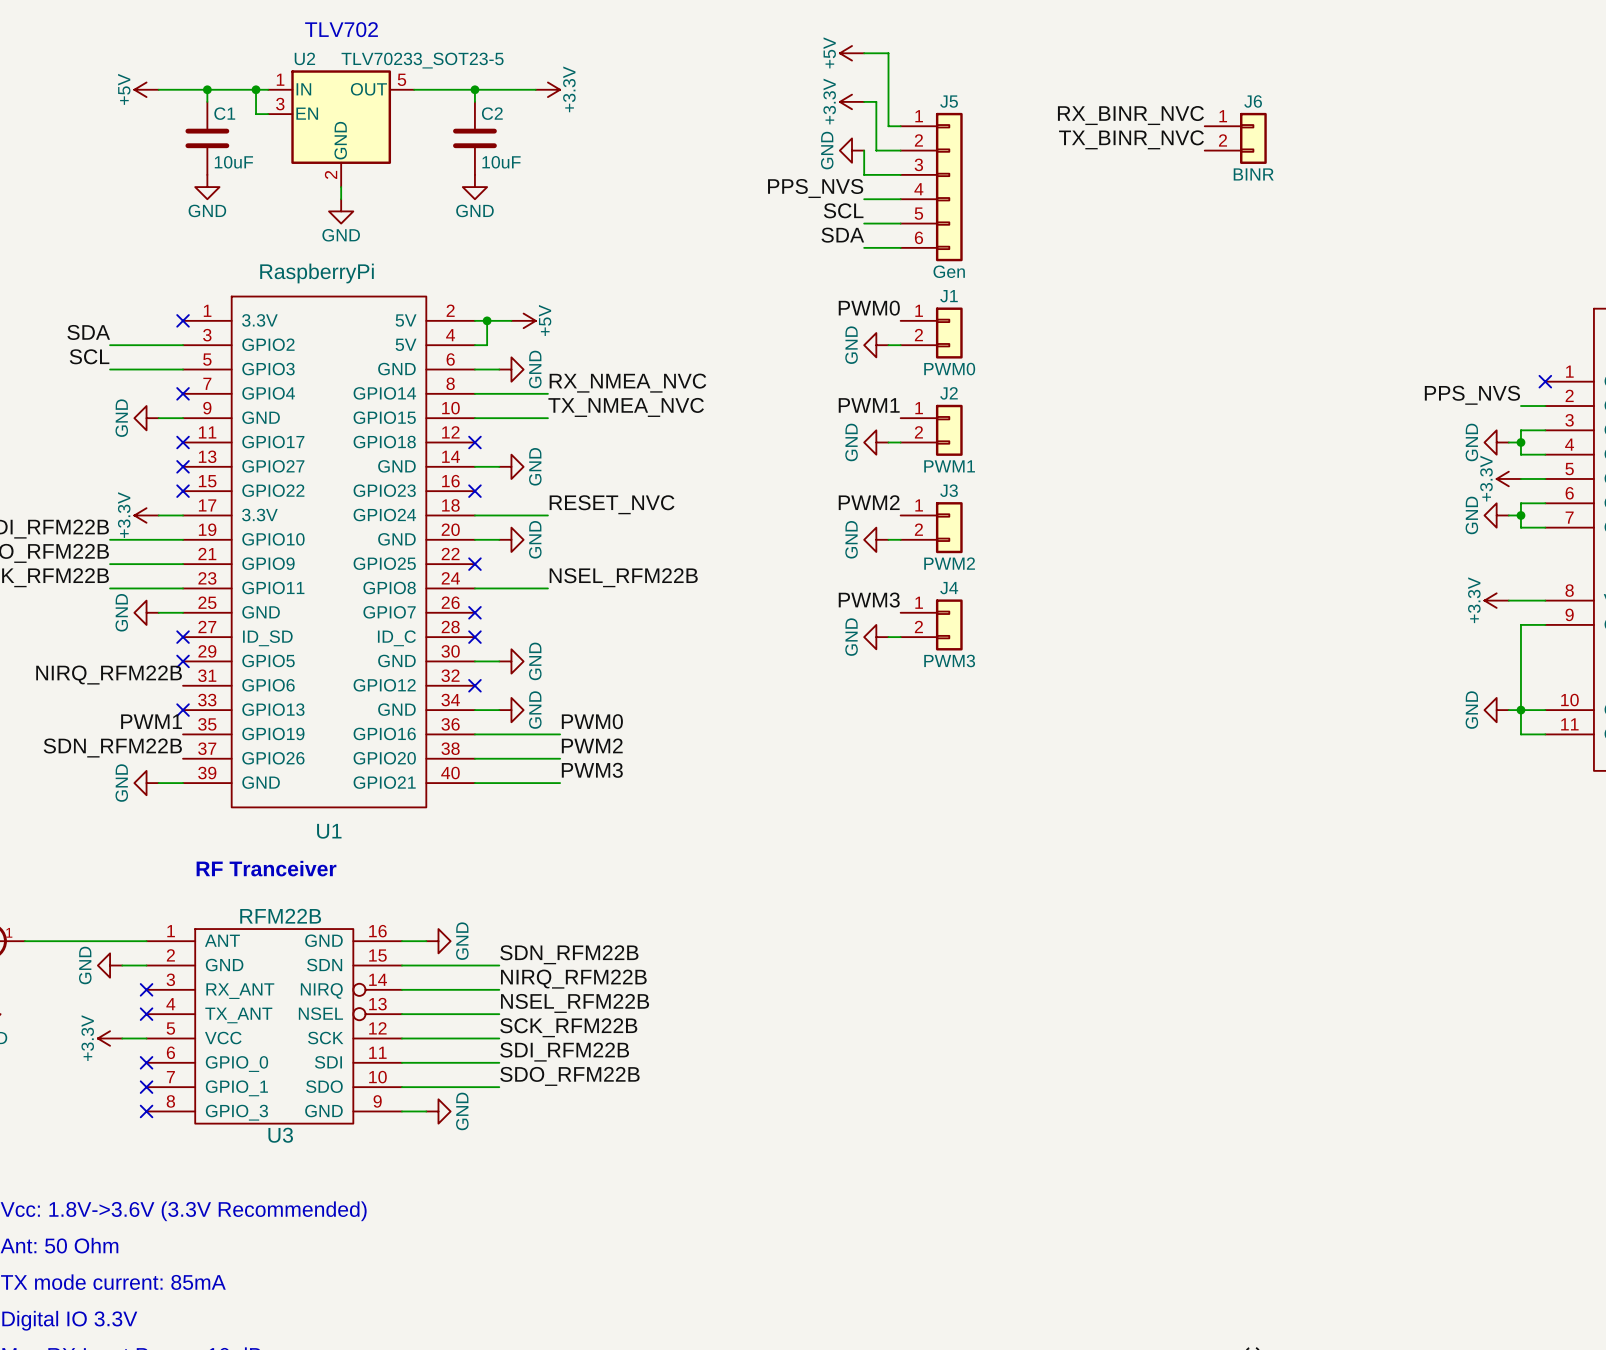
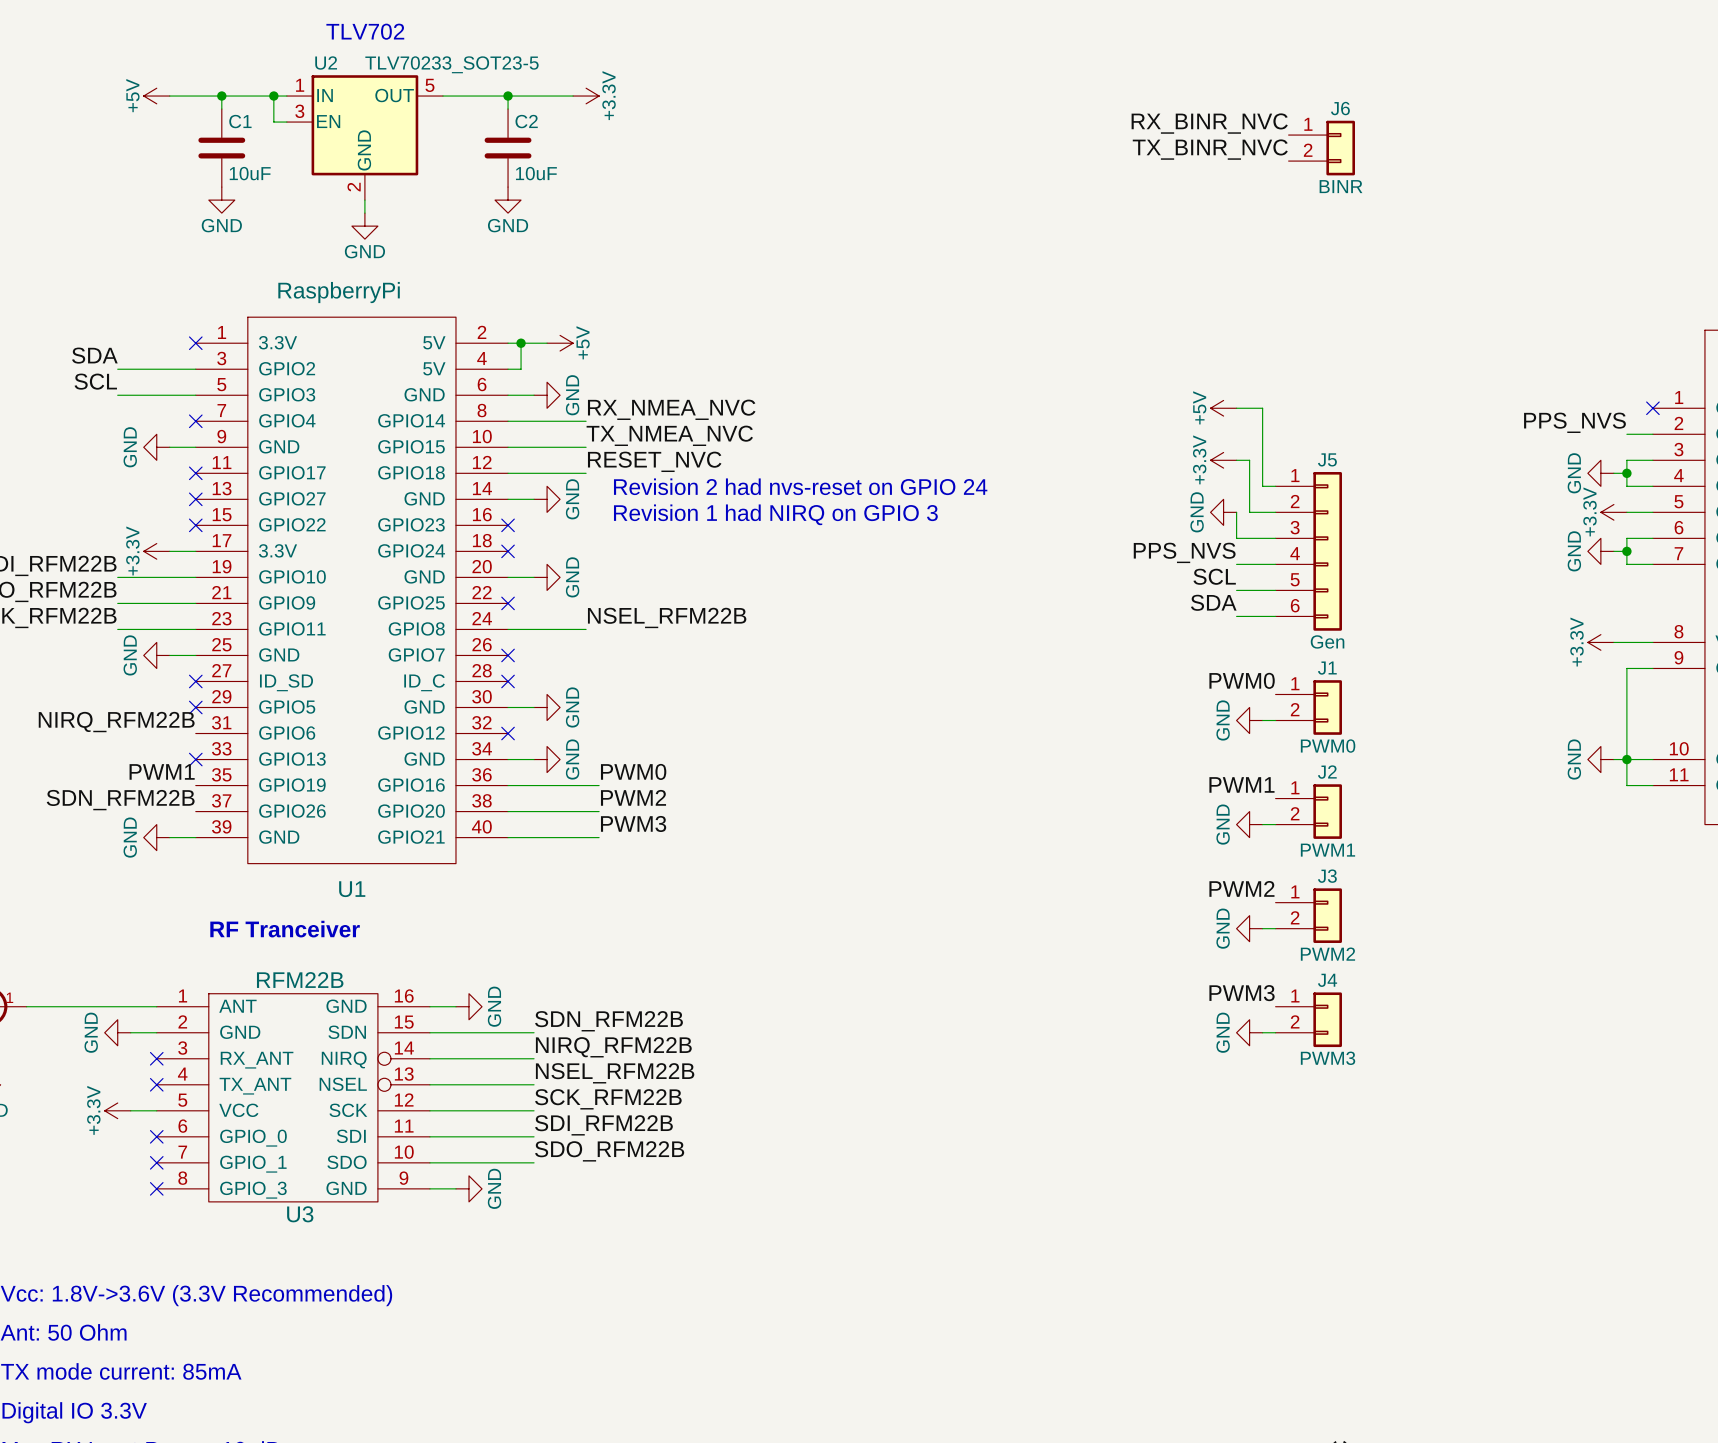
power symbol: +5V (852, 53) -> none
wire: (864, 53) (888, 53) (888, 126) (900, 126) -> none
power symbol: +3.3V (852, 101) -> none
wire: (864, 101) (876, 101) (876, 150) (900, 150) -> none
power symbol: GND (852, 150) -> none
wire: (864, 150) (864, 174) (900, 174) -> none
J5 position: (931, 187) -> (1308, 551)
label: PPS_NVS (815, 188) -> none
wire: (864, 199) (900, 199) -> none
label: SCL (843, 210) -> none
wire: (864, 223) (900, 223) -> none
label: SDA (842, 235) -> none
wire: (864, 247) (900, 247) -> none
label: PWM0 (869, 308) -> none
J1 position: (931, 333) -> (1308, 707)
power symbol: GND (876, 345) -> none
wire: (888, 345) (900, 345) -> none
power symbol: none -> +5V (1223, 408)
wire: none -> (1236, 408) (1262, 408) (1262, 486) (1275, 486)
label: PWM1 (869, 405) -> none
J2 position: (931, 430) -> (1308, 811)
power symbol: none -> +3.3V (1223, 460)
wire: none -> (1236, 460) (1249, 460) (1249, 512) (1275, 512)
no-connect mark: (474, 442) -> none
power symbol: GND (876, 442) -> none
wire: (888, 442) (900, 442) -> none
text: none -> Revision 2 had nvs-reset on GPIO 24 (800, 486)
power symbol: none -> GND (1223, 512)
wire: none -> (1236, 512) (1236, 538) (1275, 538)
text: none -> Revision 1 had NIRQ on GPIO 3 (775, 514)
label: PWM2 (869, 502) -> none
label position: RESET_NVC (612, 504) -> RESET_NVC (654, 461)
wire: (474, 515) (547, 515) -> (508, 473) (586, 473)
no-connect mark: none -> (508, 551)
label: none -> PPS_NVS (1184, 552)
J3 position: (931, 527) -> (1308, 915)
wire: none -> (1236, 564) (1275, 564)
power symbol: GND (876, 539) -> none
wire: (888, 539) (900, 539) -> none
label: none -> SCL (1214, 576)
wire: none -> (1236, 590) (1275, 590)
label: none -> SDA (1213, 602)
wire: none -> (1236, 616) (1275, 616)
label: PWM3 (869, 600) -> none
J4 position: (931, 624) -> (1308, 1019)
label: none -> PWM0 (1242, 680)
power symbol: GND (876, 637) -> none
wire: (888, 637) (900, 637) -> none
power symbol: none -> GND (1249, 720)
wire: none -> (1262, 720) (1275, 720)
label: none -> PWM1 (1241, 784)
power symbol: none -> GND (1249, 824)
wire: none -> (1262, 824) (1275, 824)
label: none -> PWM2 (1241, 888)
power symbol: none -> GND (1249, 928)
wire: none -> (1262, 928) (1275, 928)
label: none -> PWM3 (1242, 993)
power symbol: none -> GND (1249, 1032)
wire: none -> (1262, 1032) (1275, 1032)

